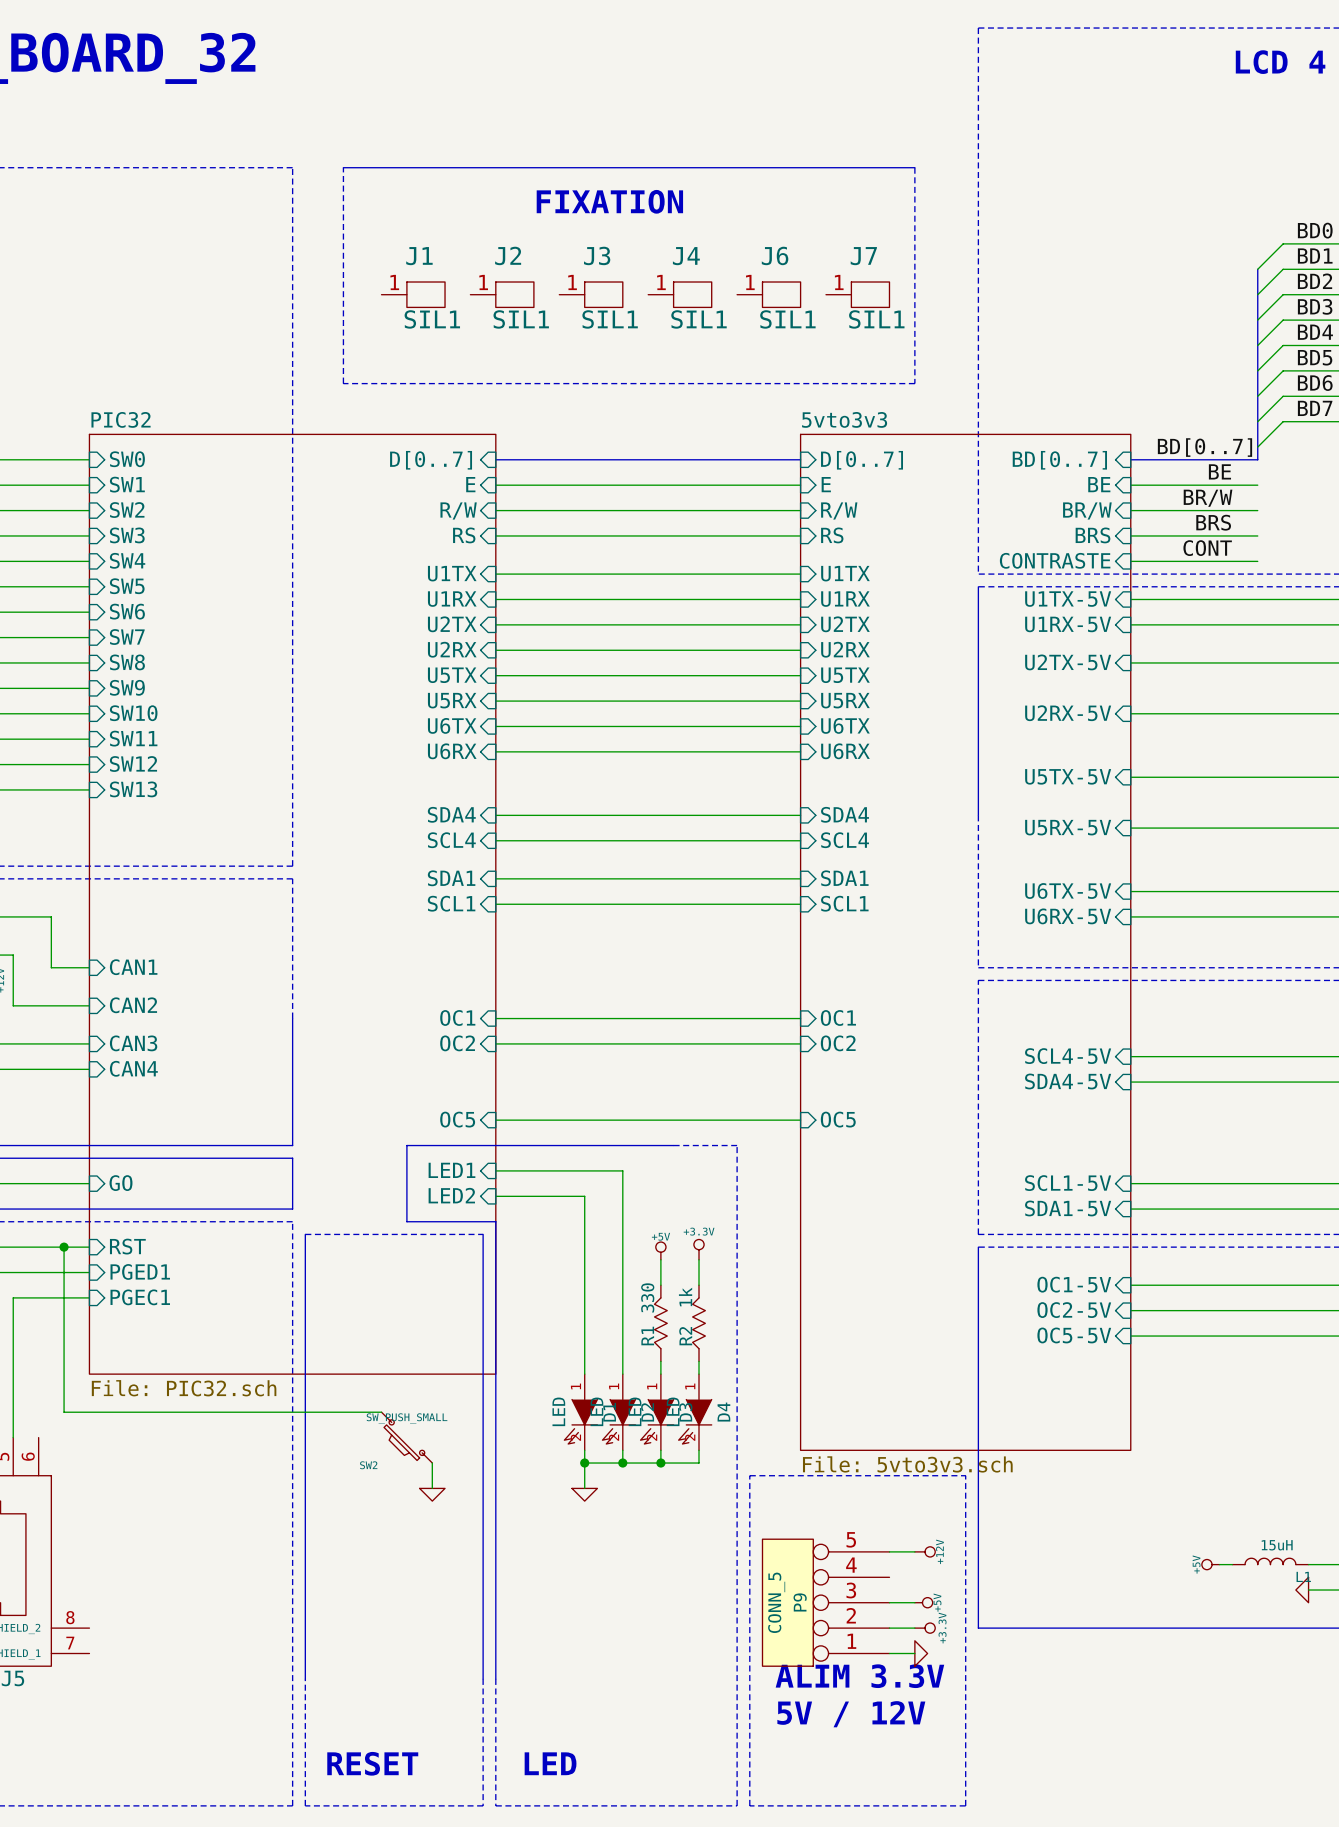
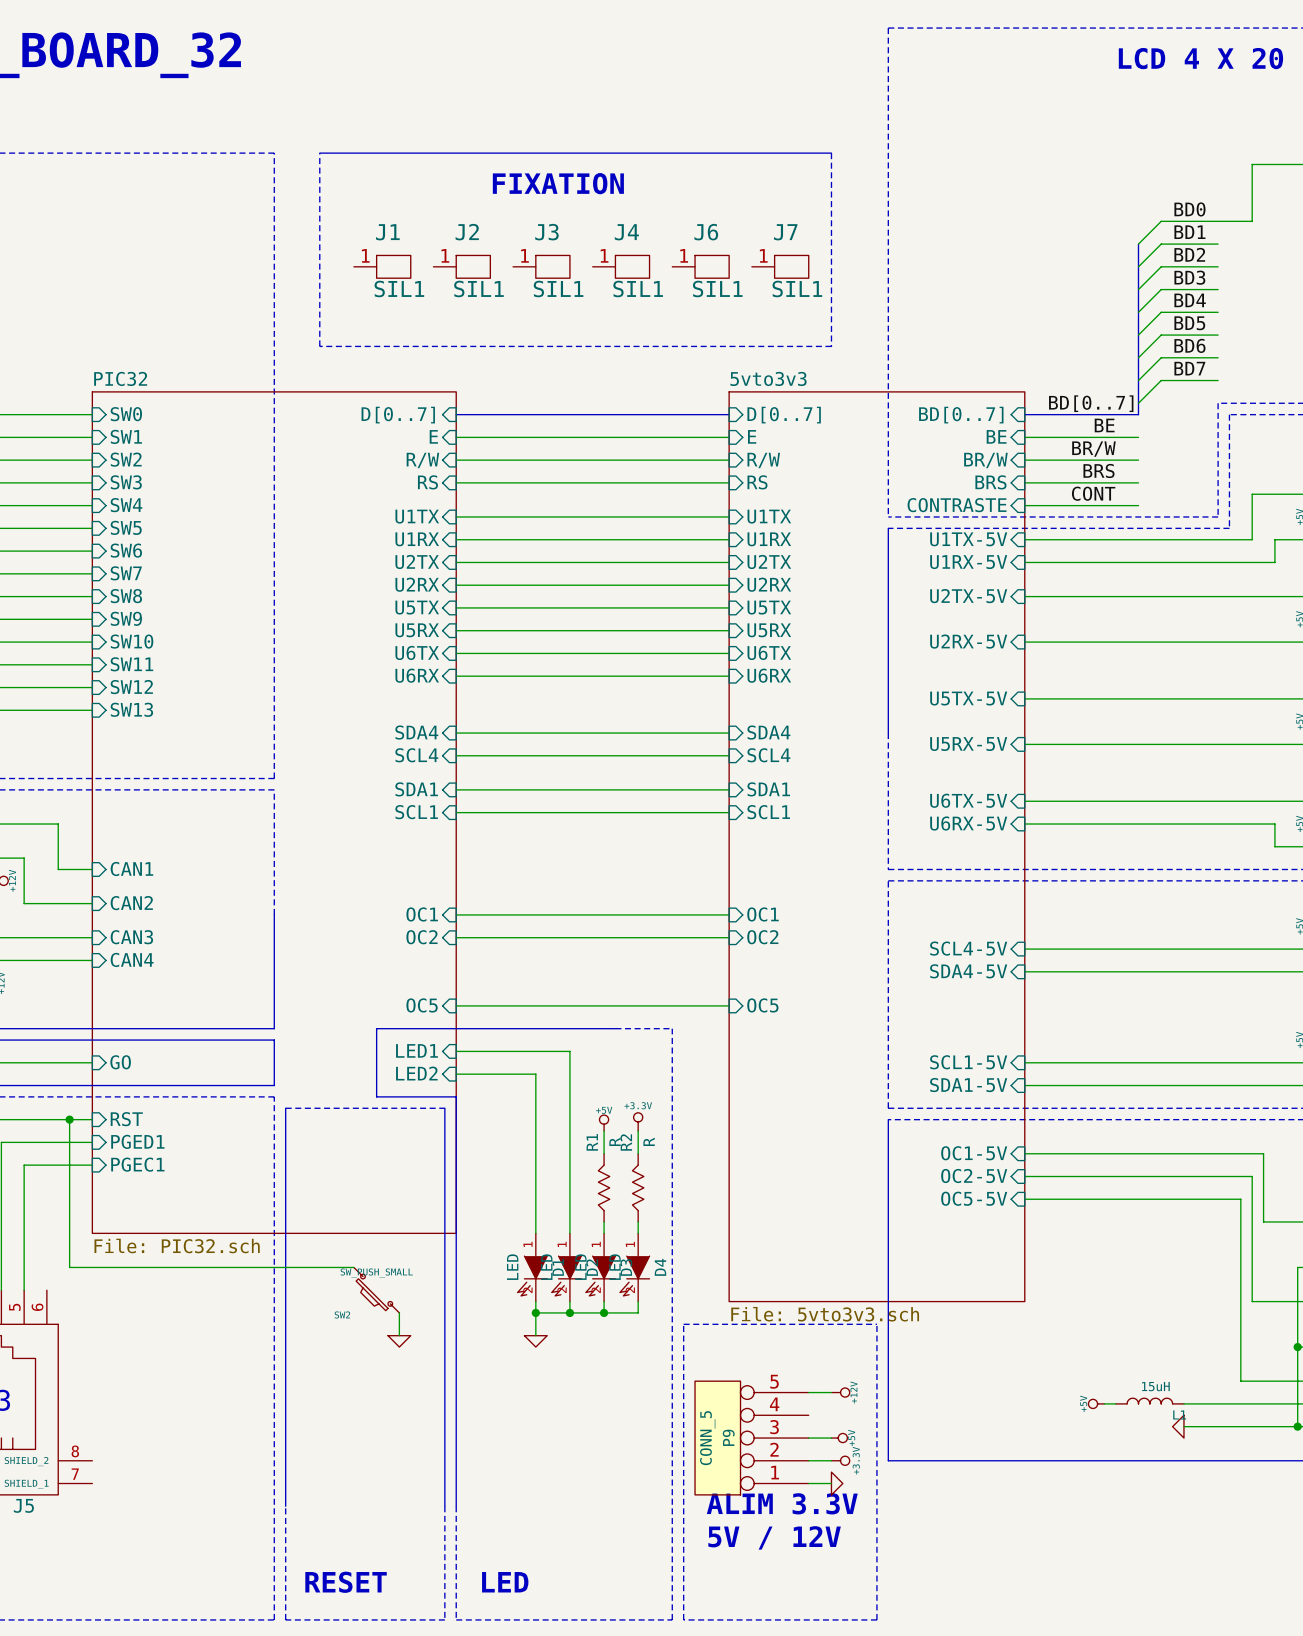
R1 value: 330 (647, 1297) -> R (615, 1141)
R2 value: 1k (685, 1297) -> R (649, 1141)
R1 name position: R1 (647, 1336) -> R1 (592, 1142)
R2 name position: R2 (685, 1336) -> R2 (626, 1142)

